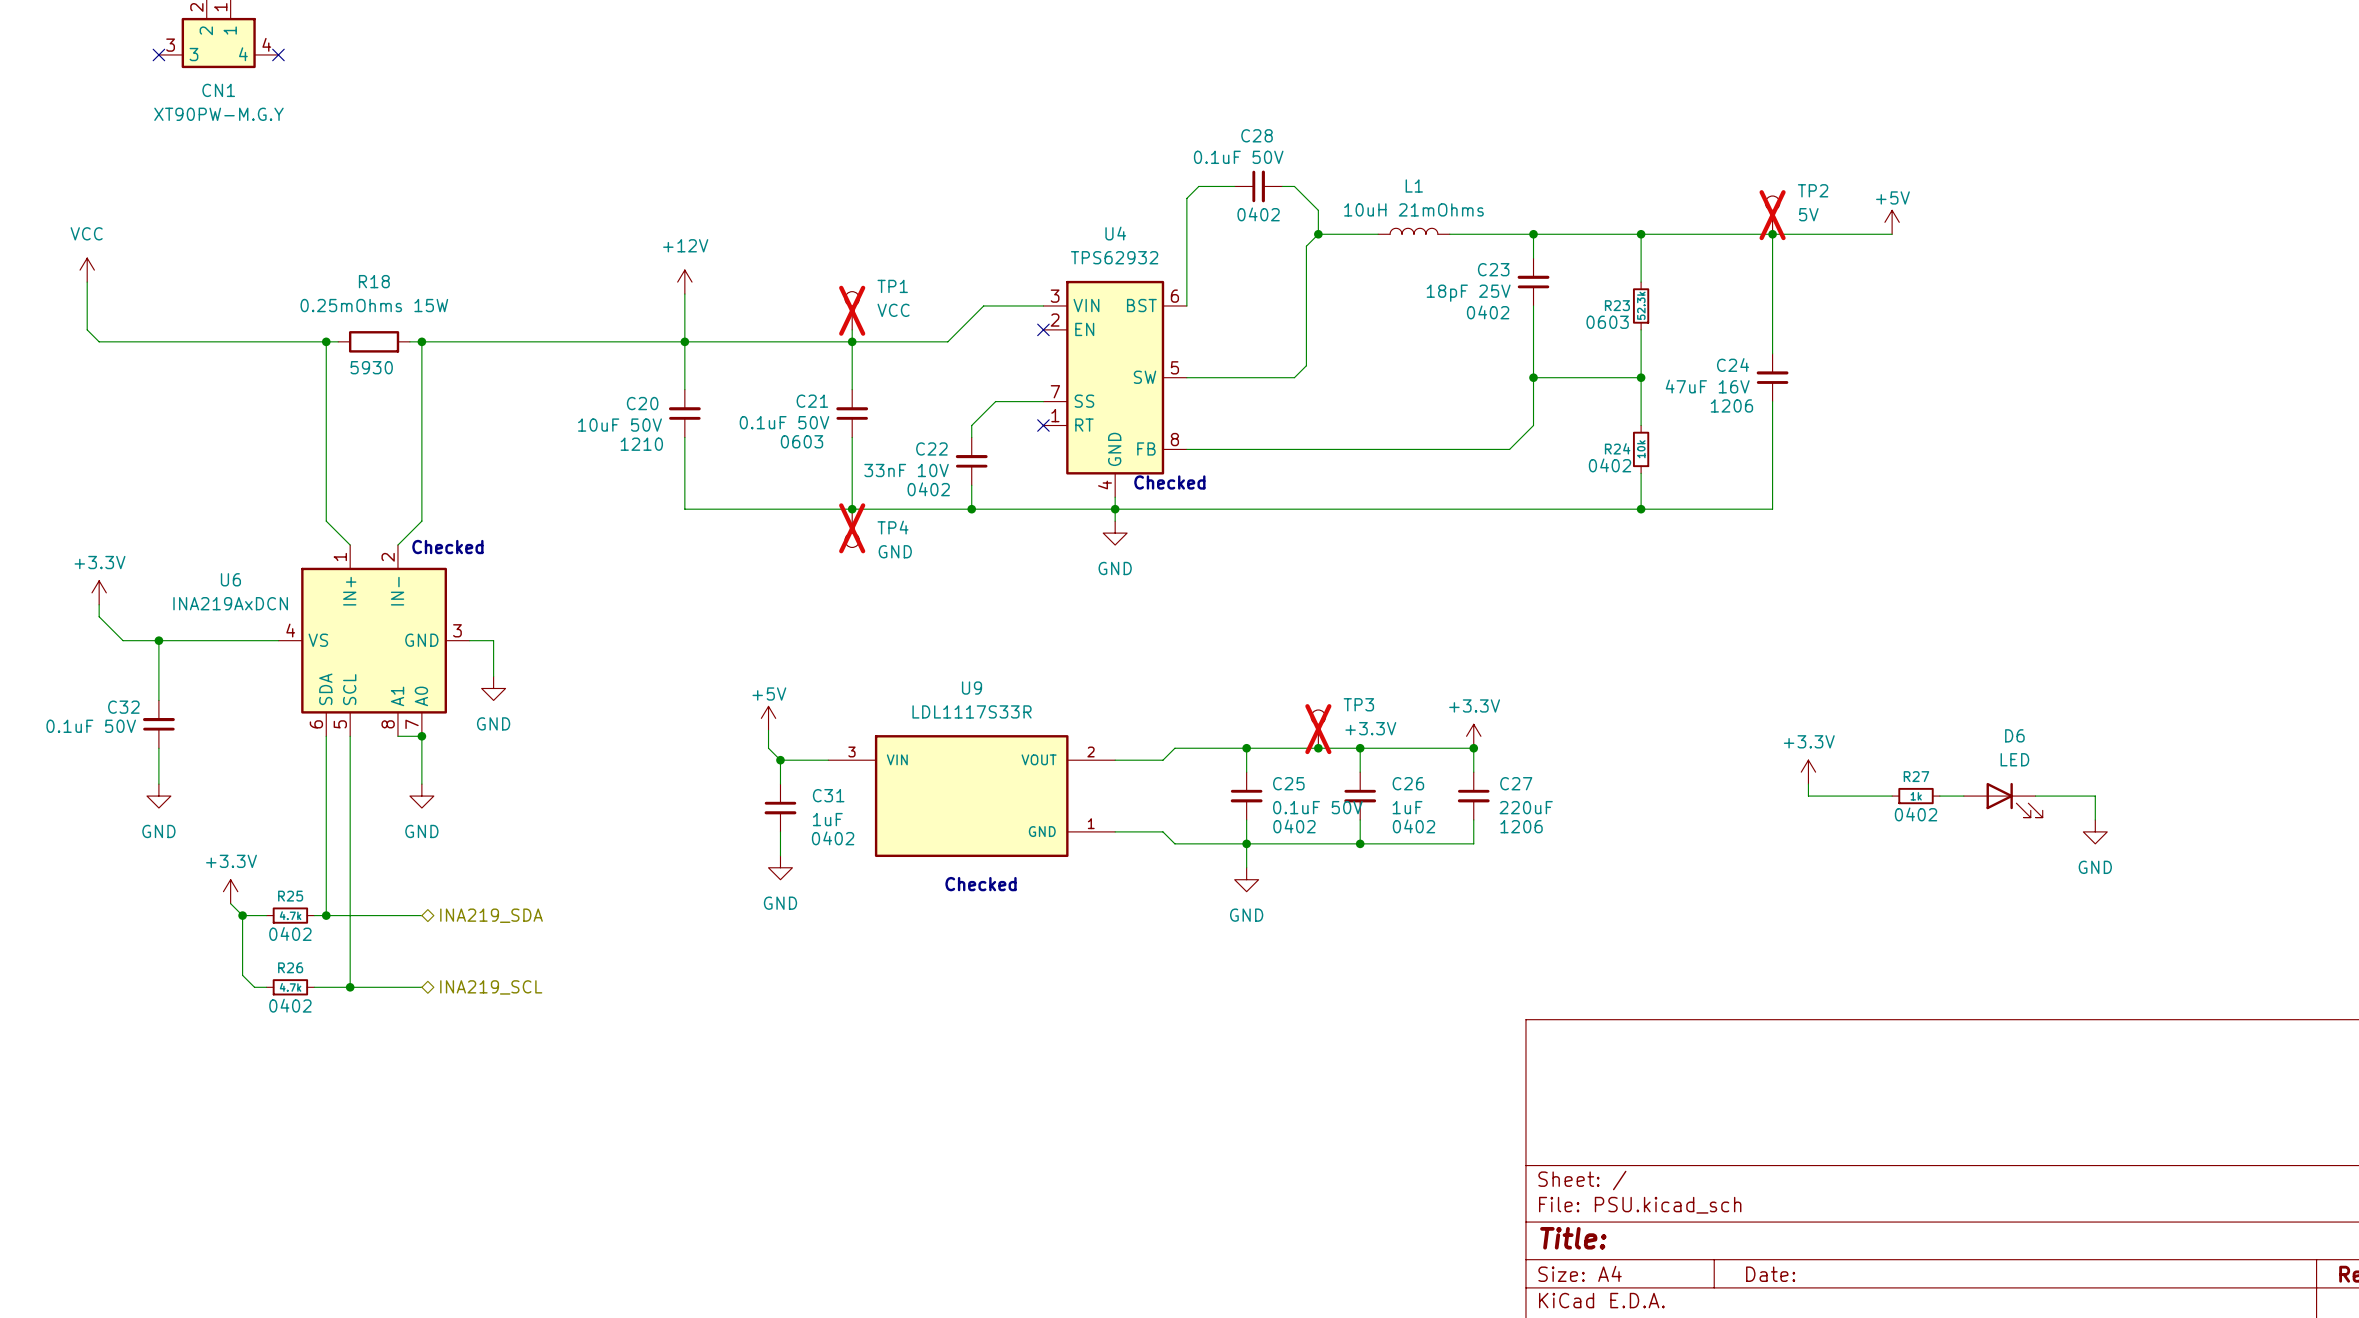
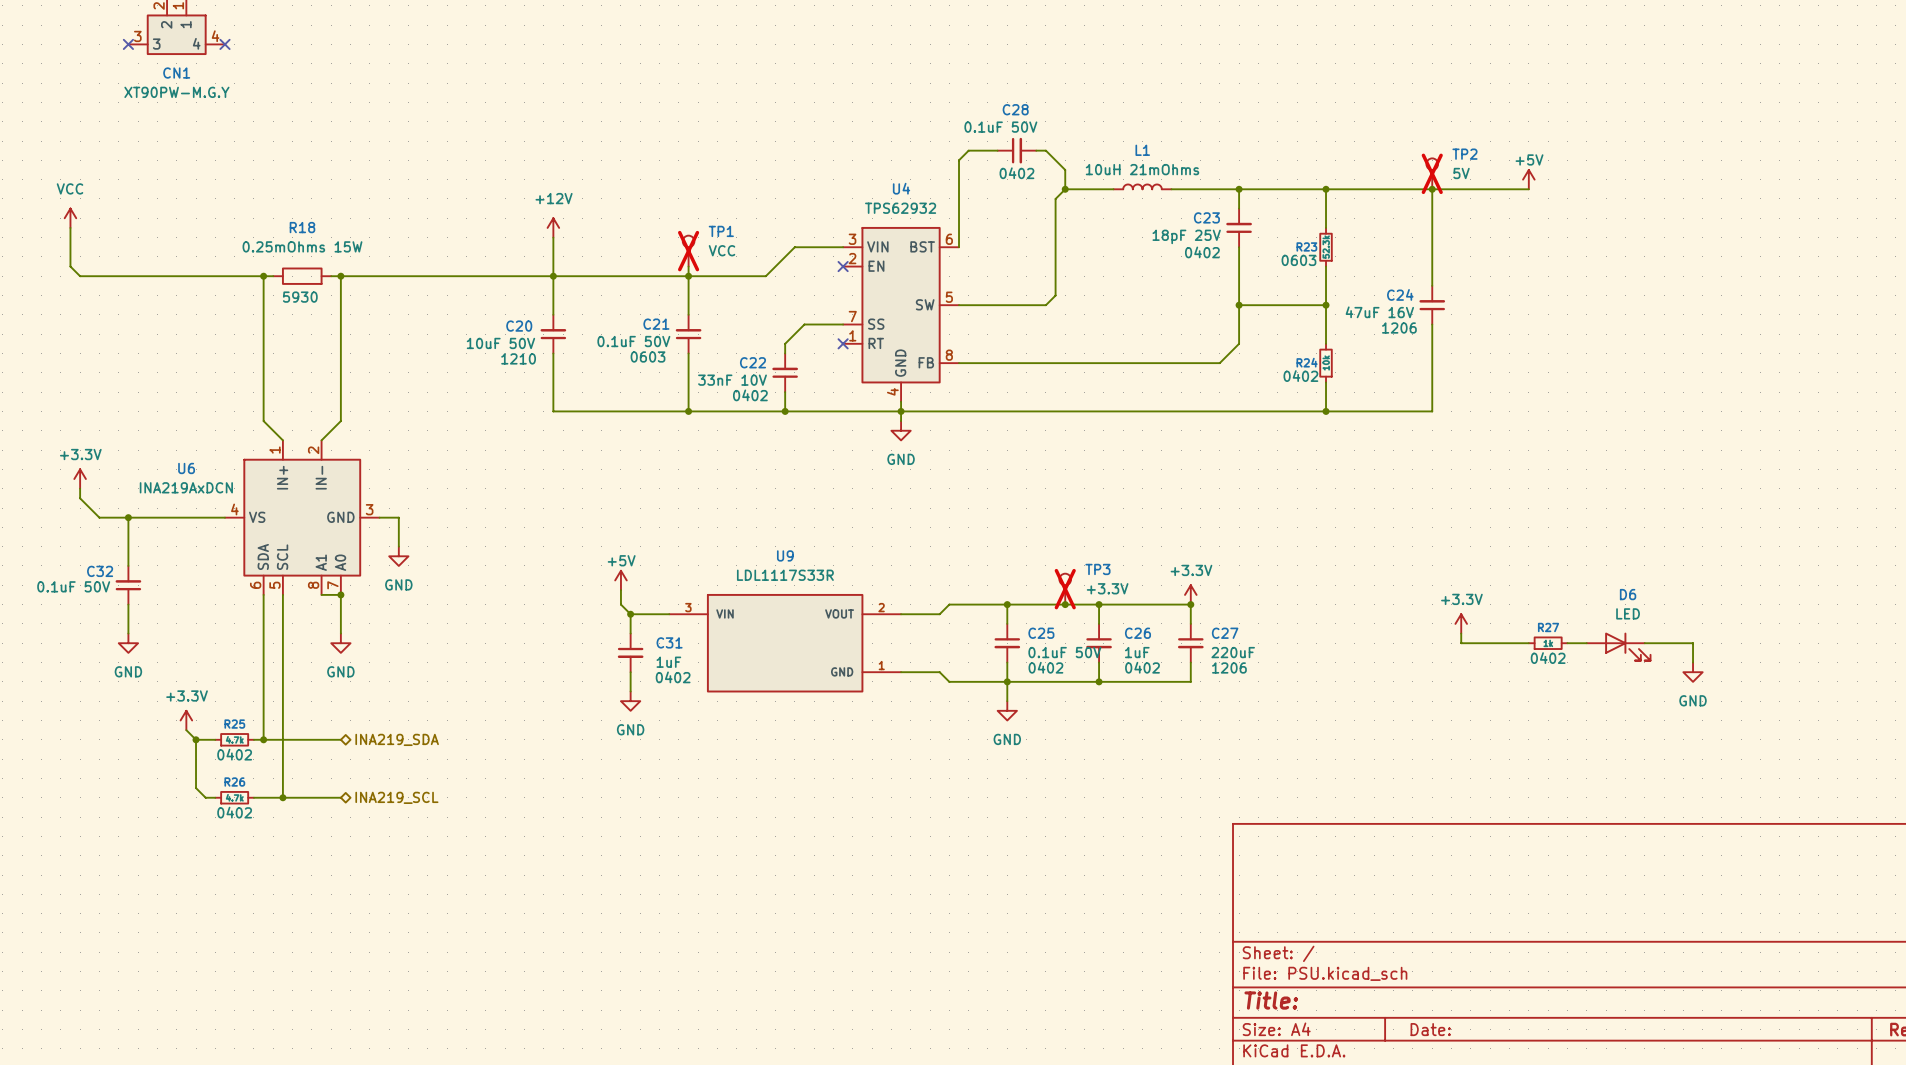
text: Checked (1169, 482) -> none
TP4: GND (852, 528) -> none
text: Checked (447, 547) -> none
text: Checked (981, 884) -> none

